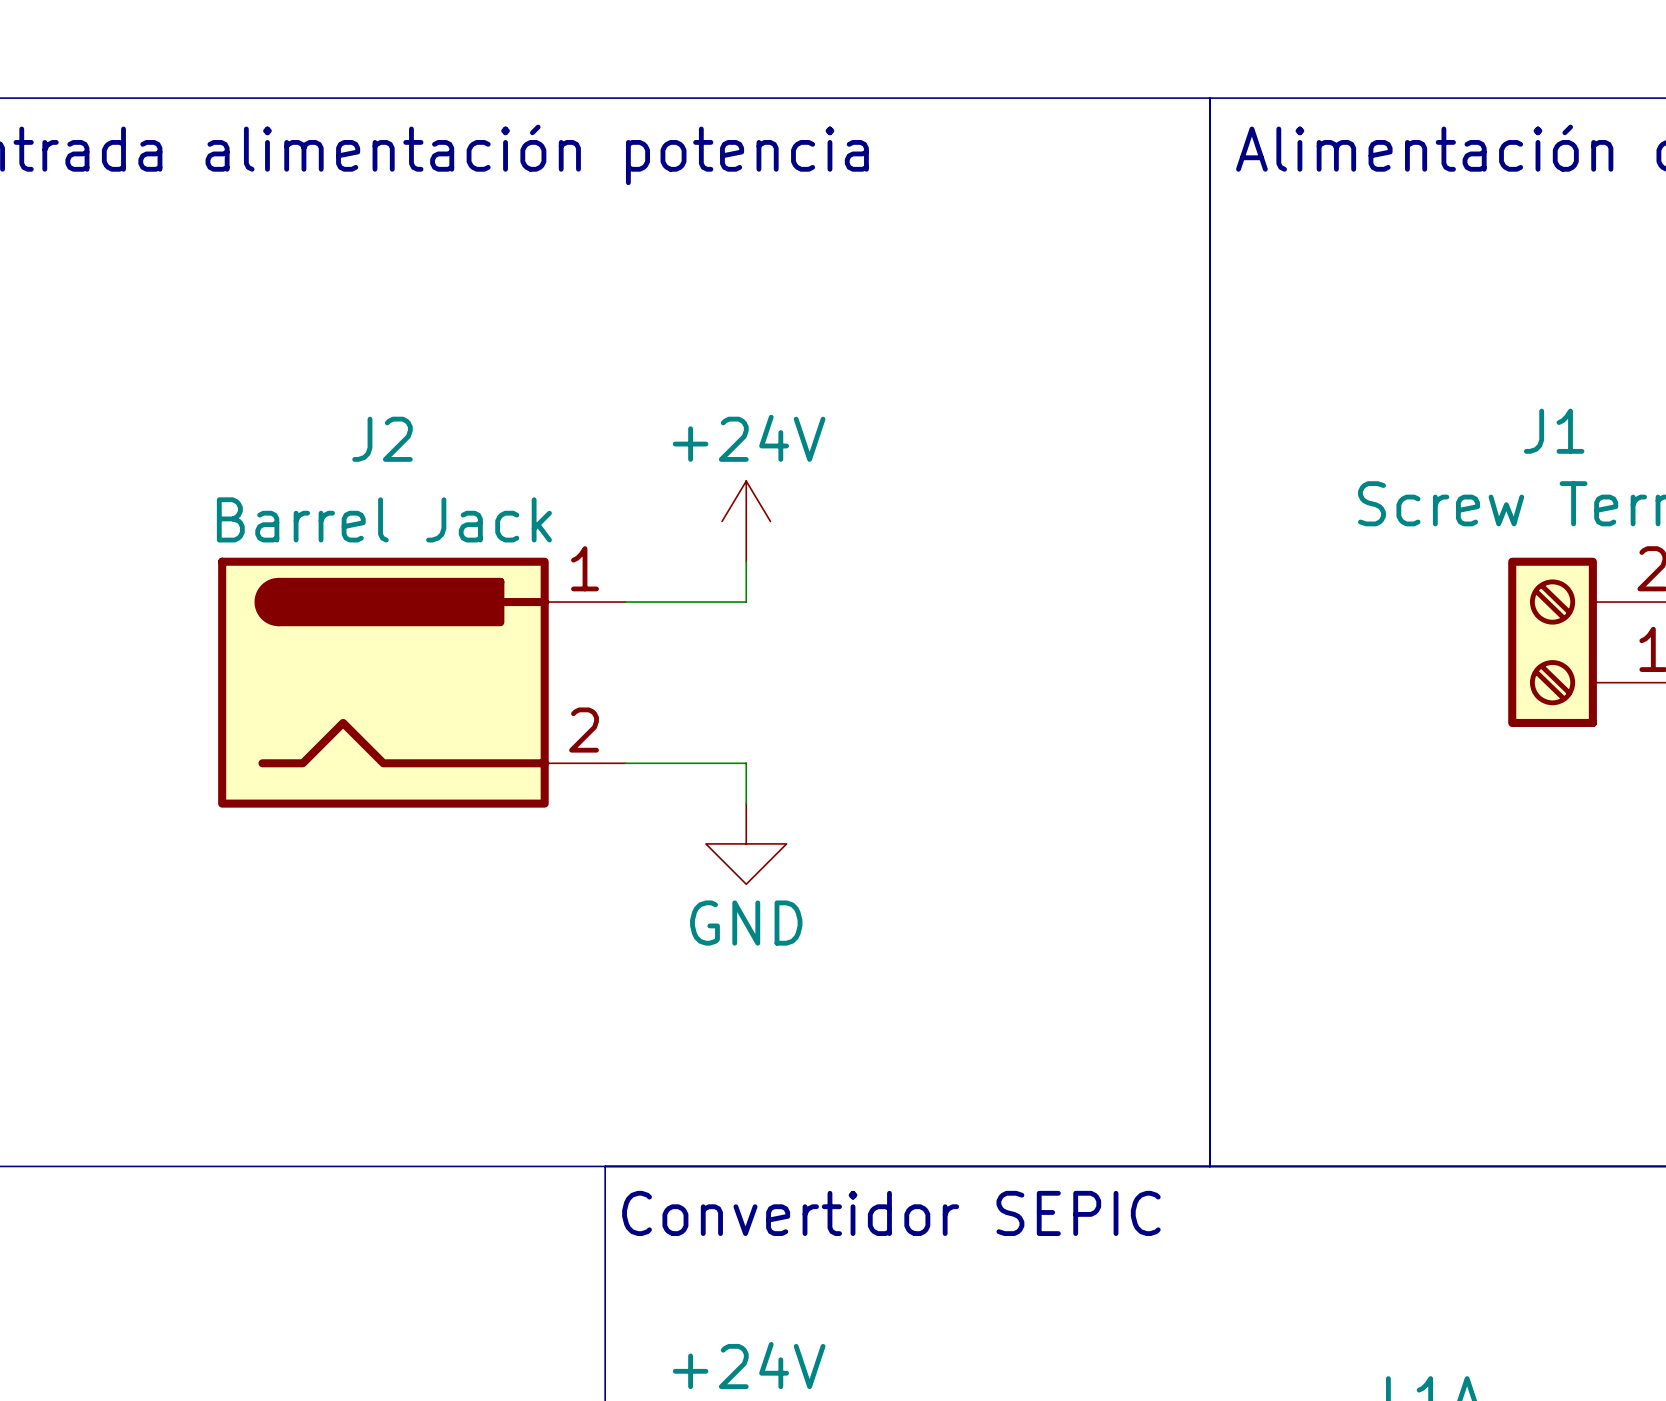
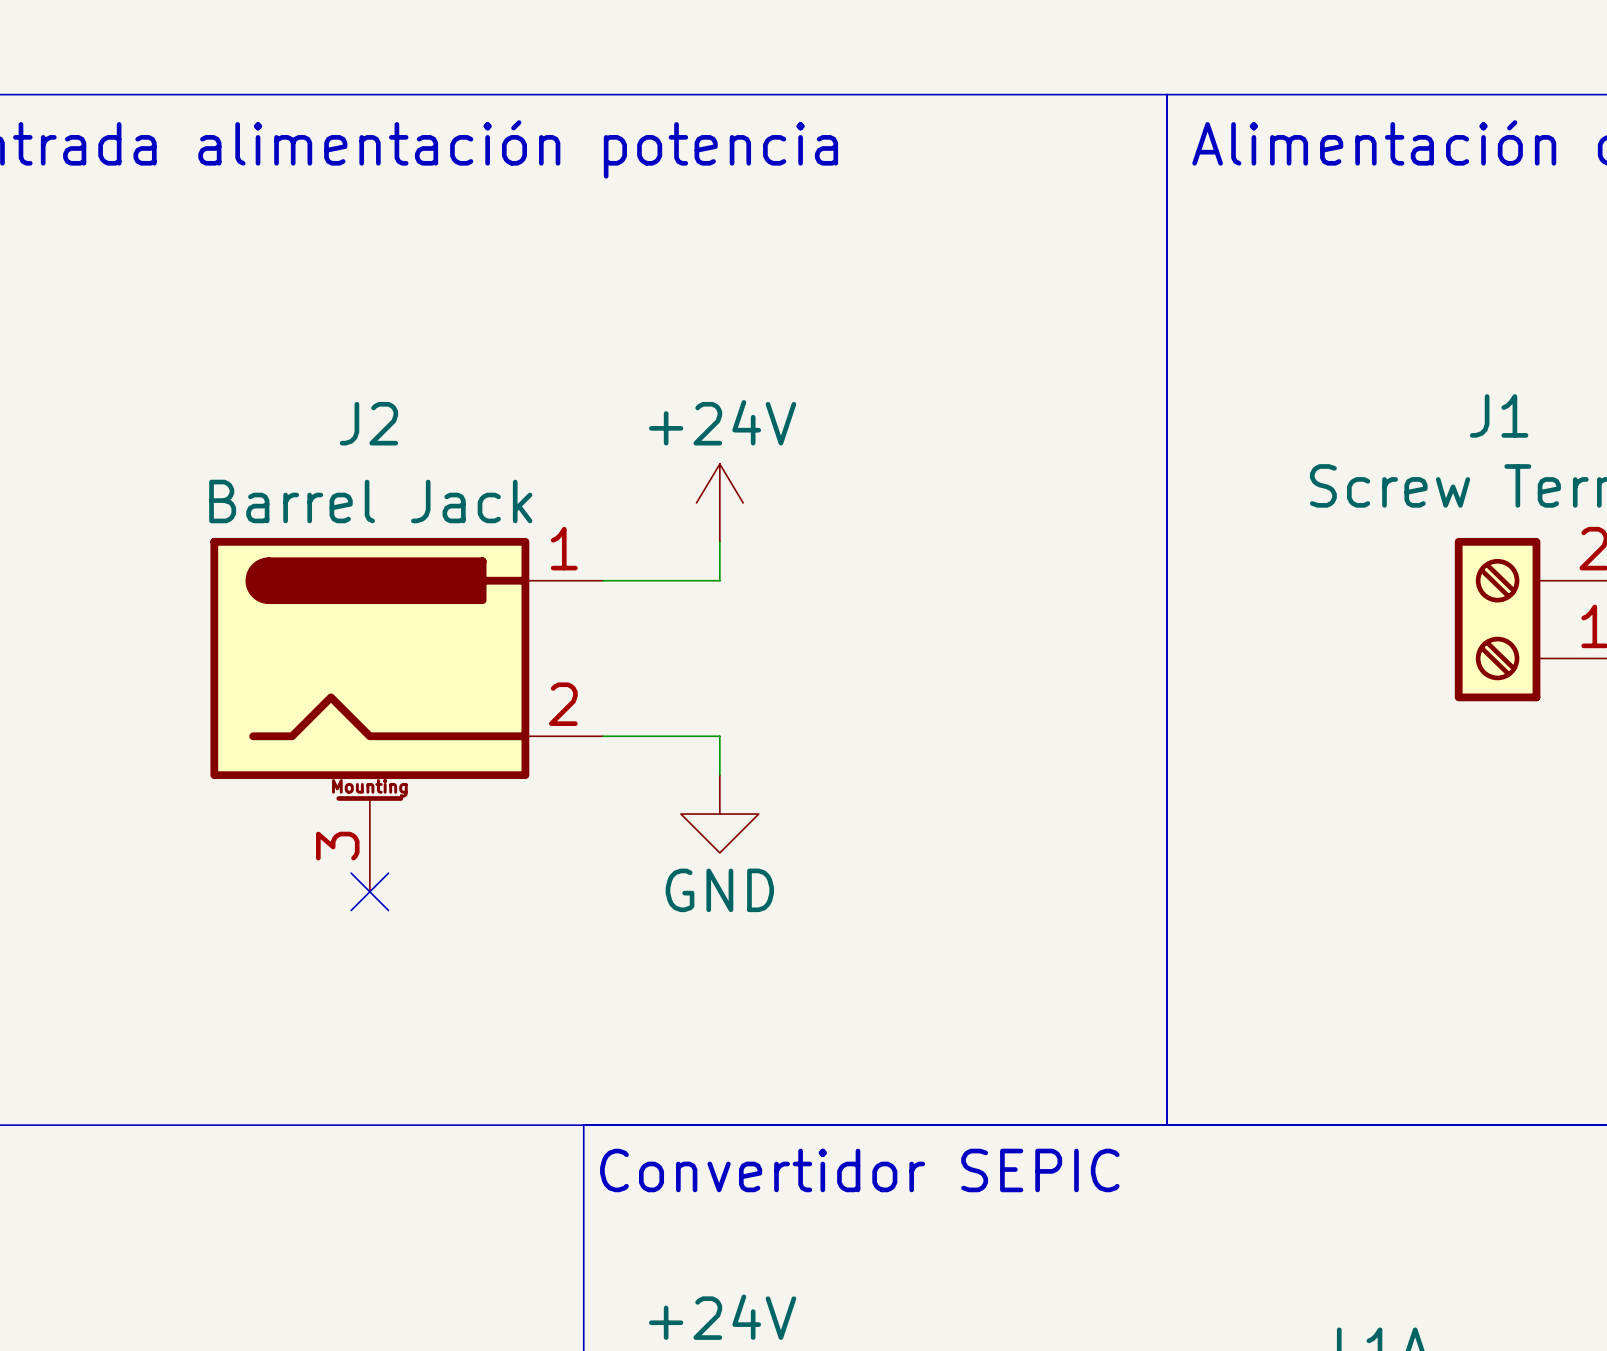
J2 symbol: [218, 557, 626, 808] -> [210, 537, 604, 892]
no-connect mark: none -> (369, 891)

